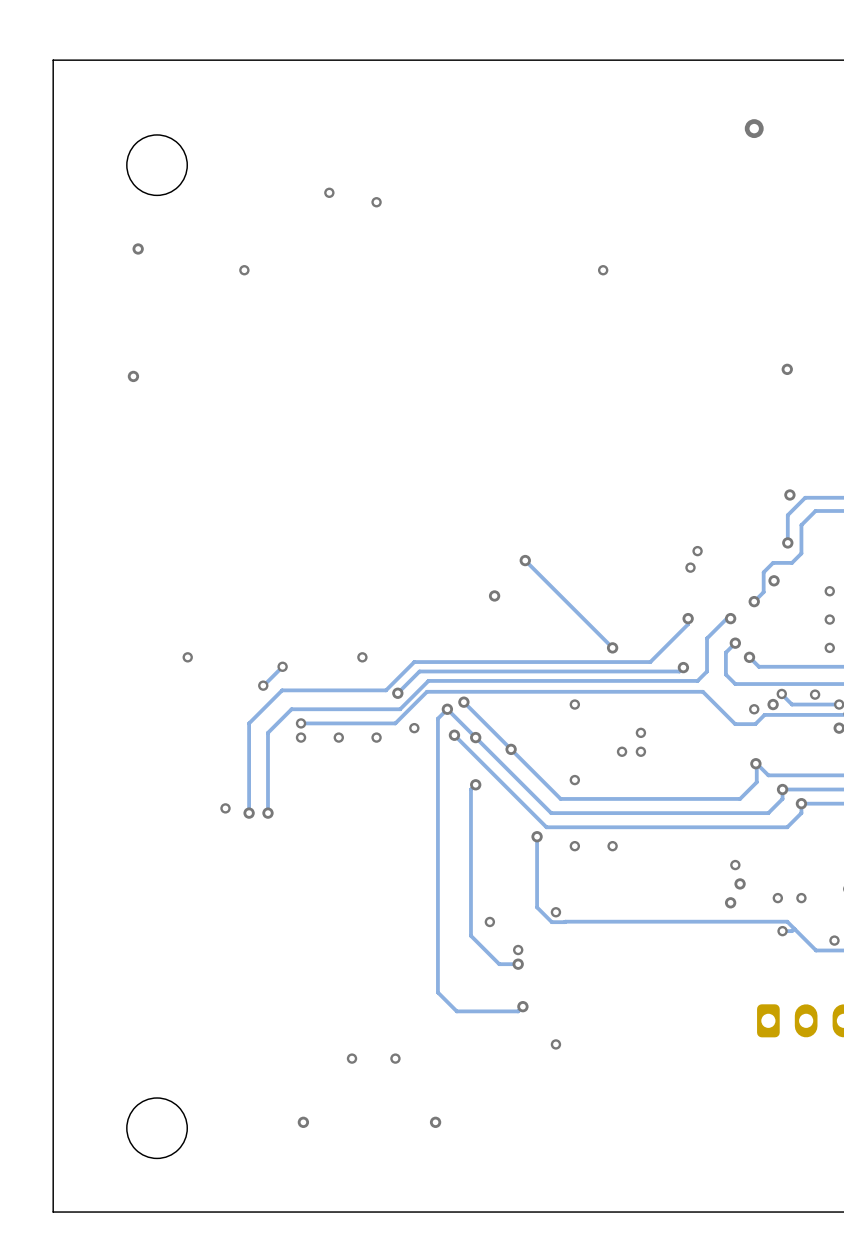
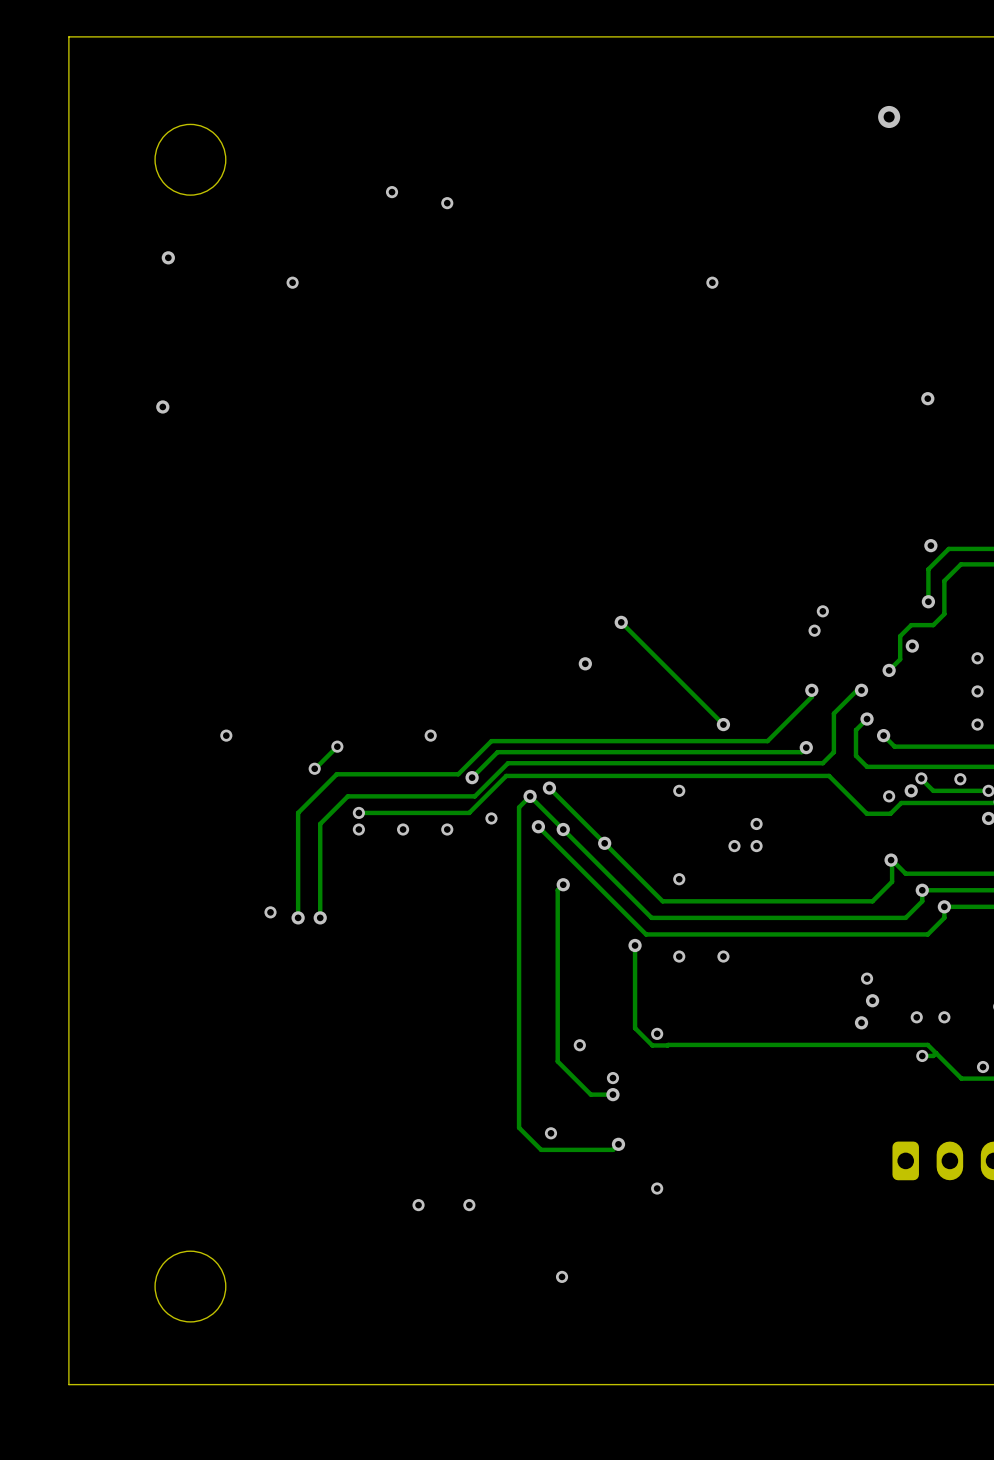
via: none -> (550, 1133)
via: none -> (562, 1276)
via: (303, 1122) -> none
via: (435, 1122) -> none

